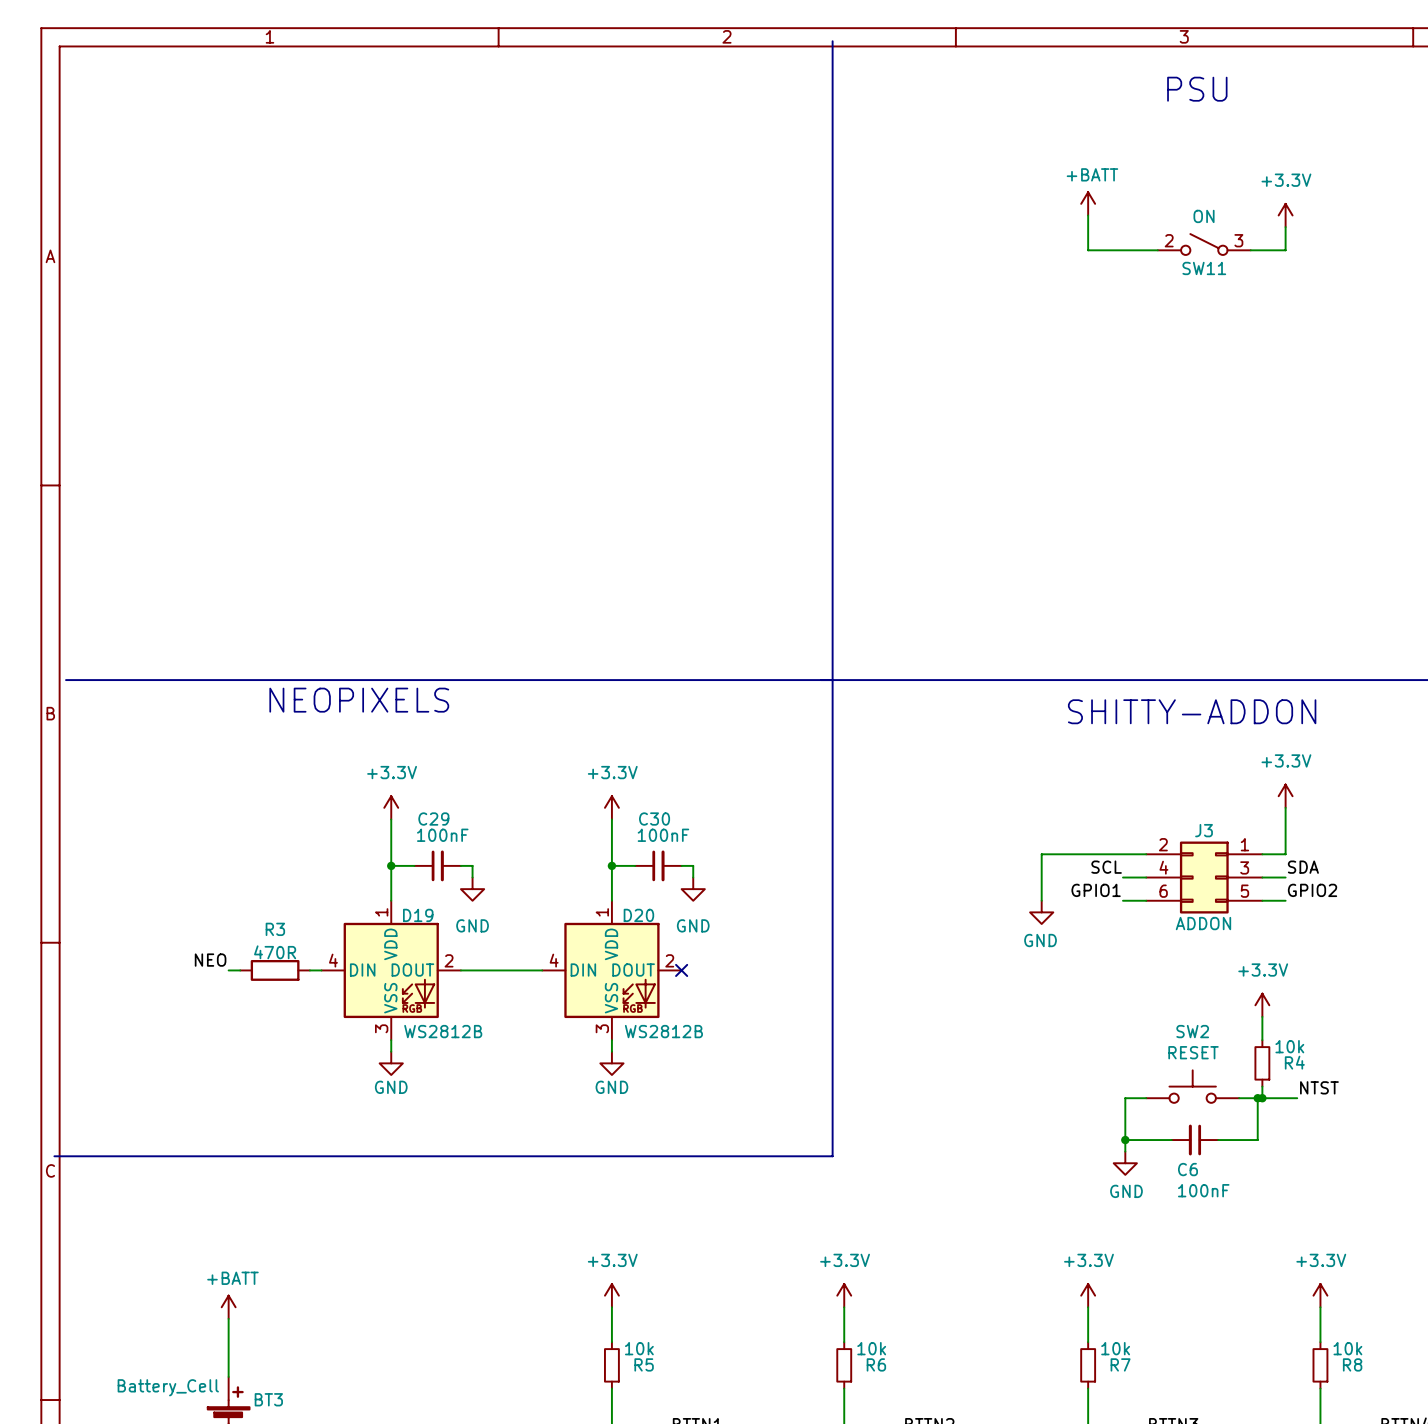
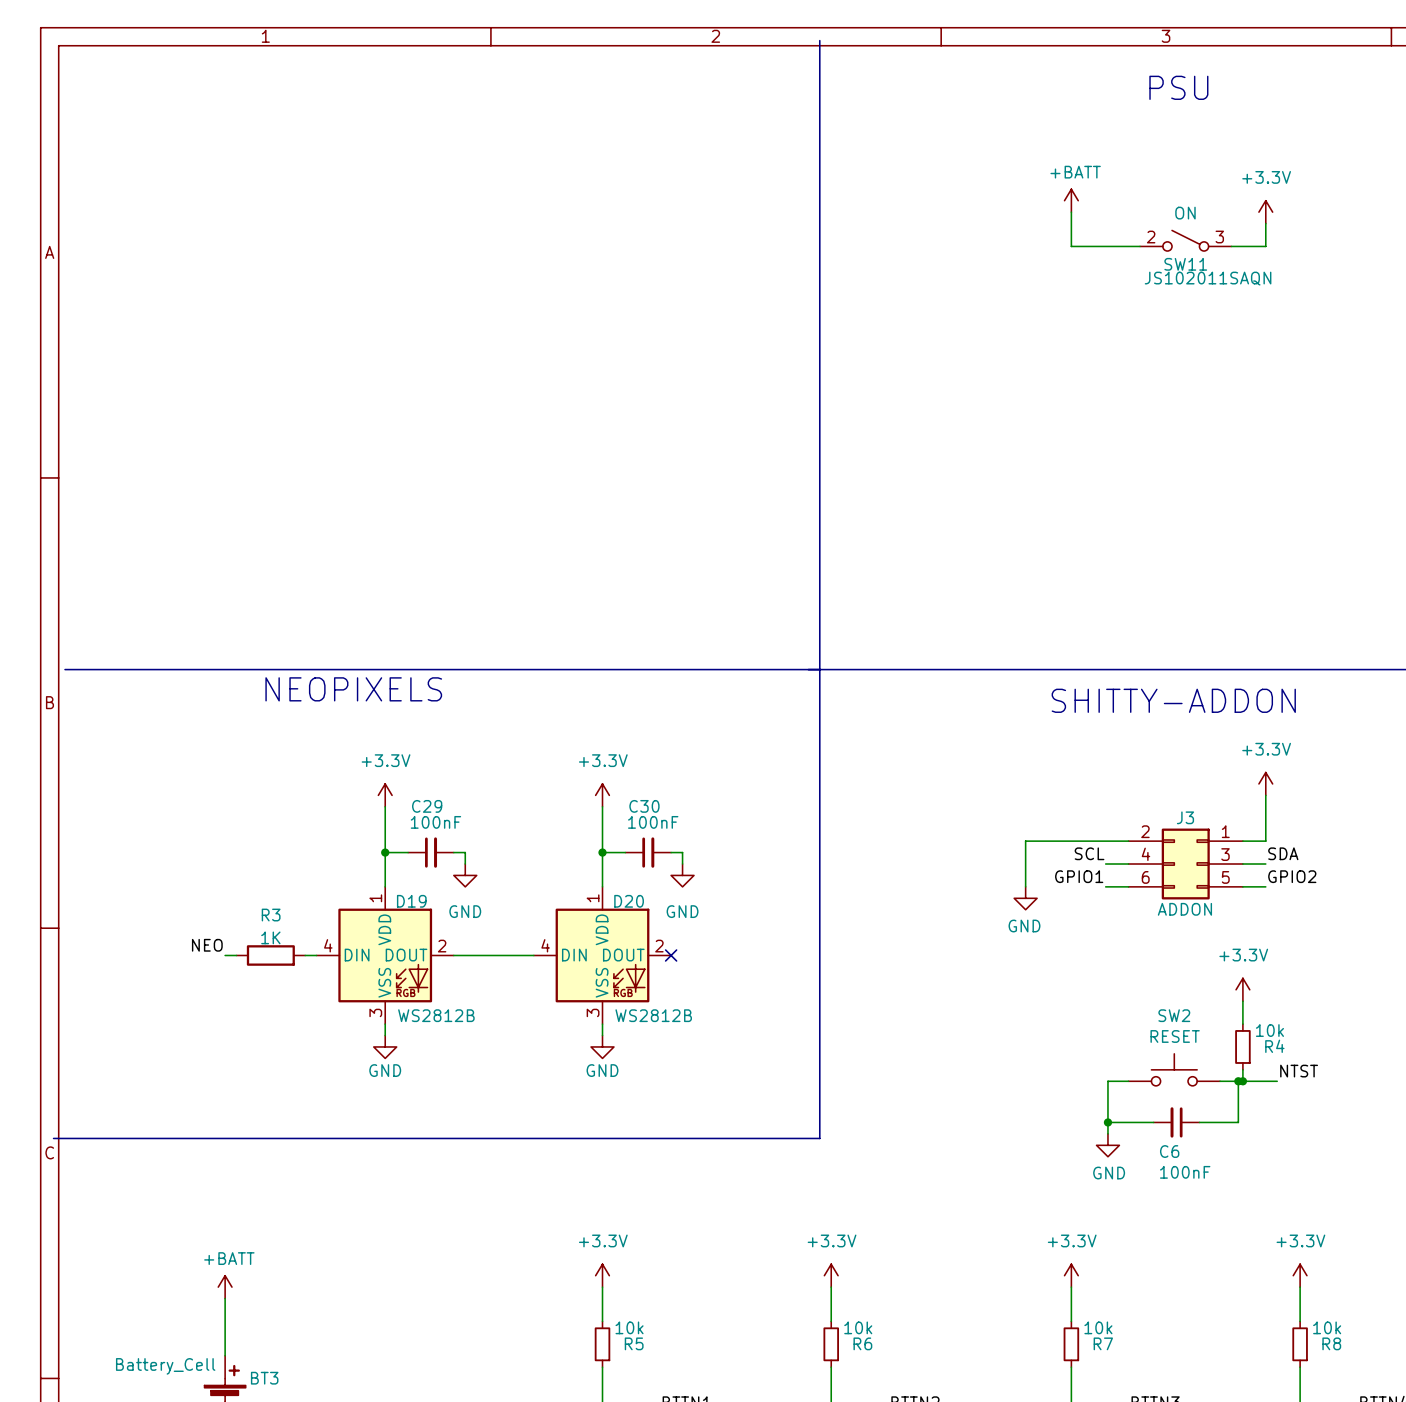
SW11 text: none -> JS102011SAQN (1208, 278)
R3 value: 470R (275, 952) -> 1K (270, 937)

